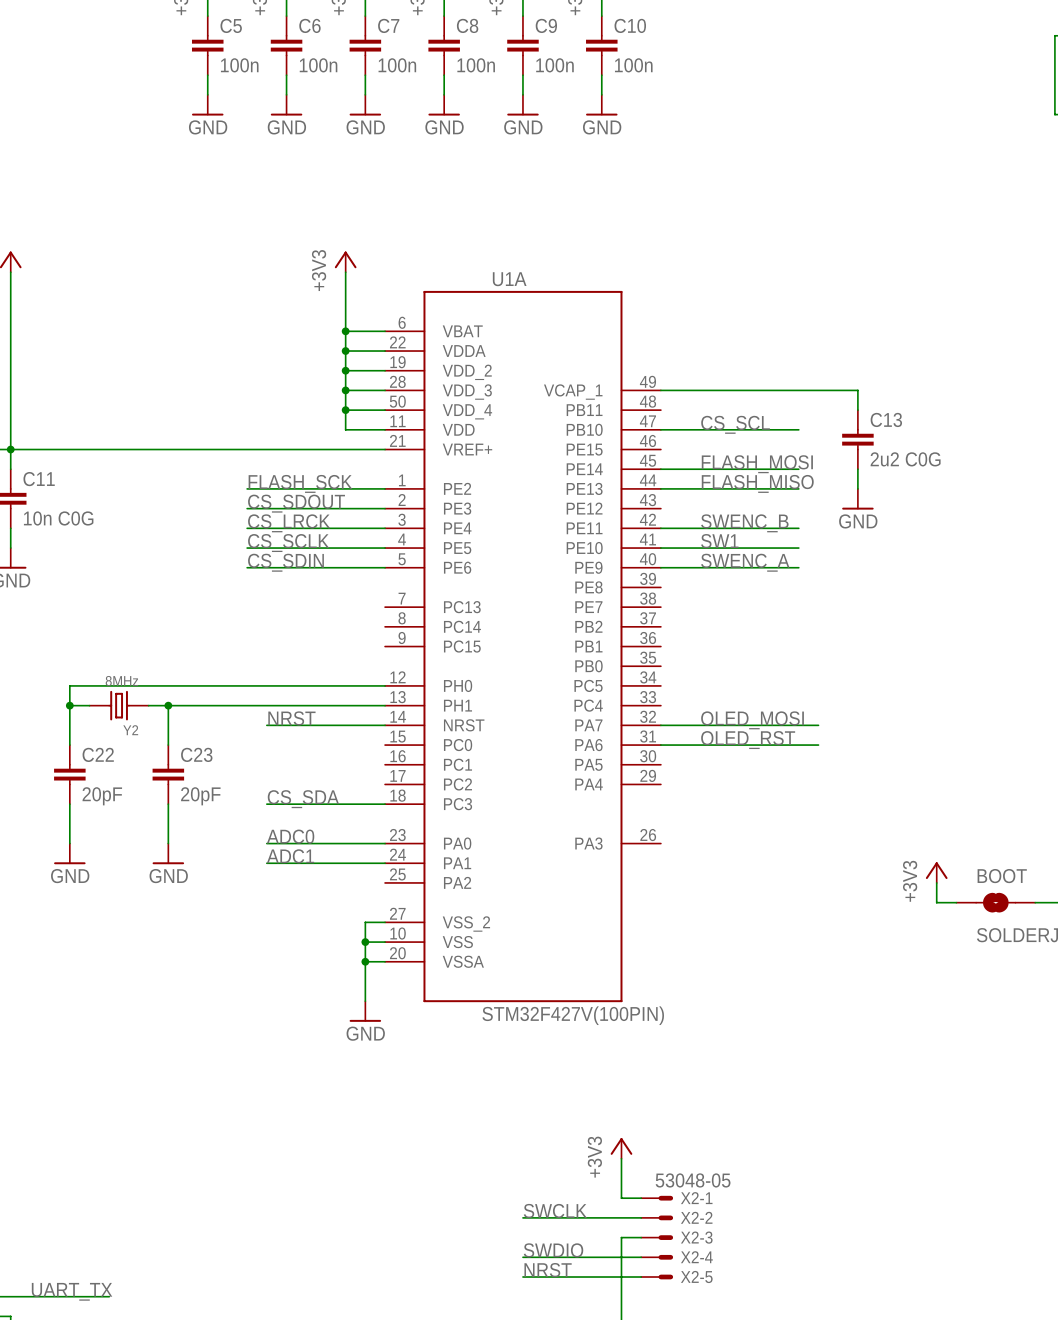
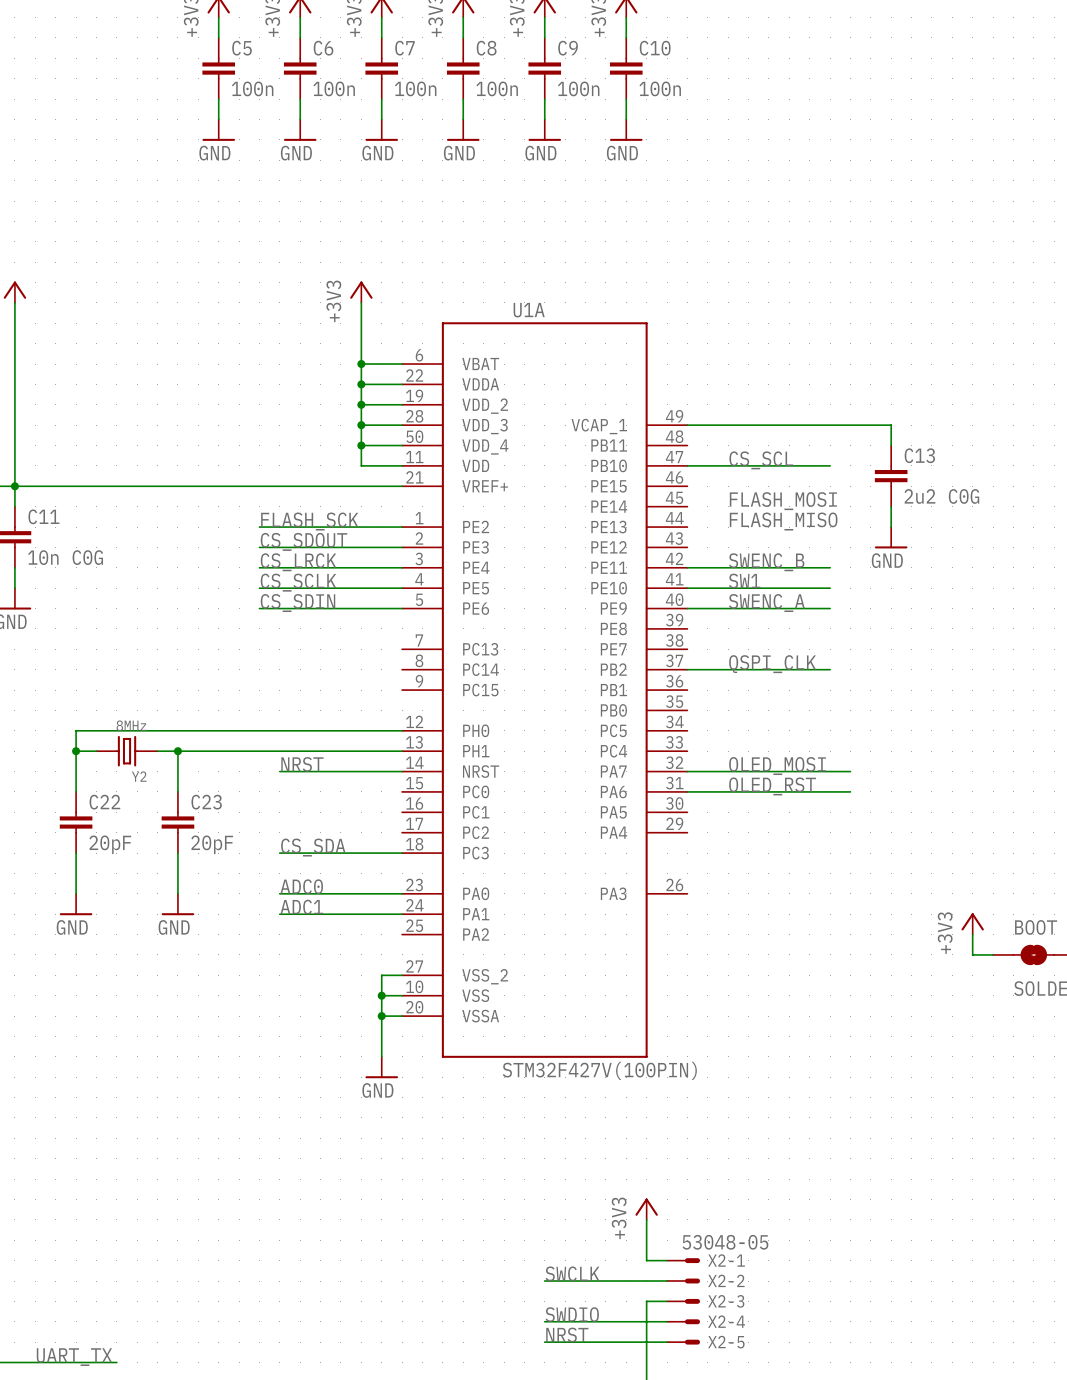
wire: (660, 469) (798, 469) -> none
wire: (660, 488) (798, 488) -> (687, 669) (830, 669)
label: none -> QSPI_CLK (772, 664)

